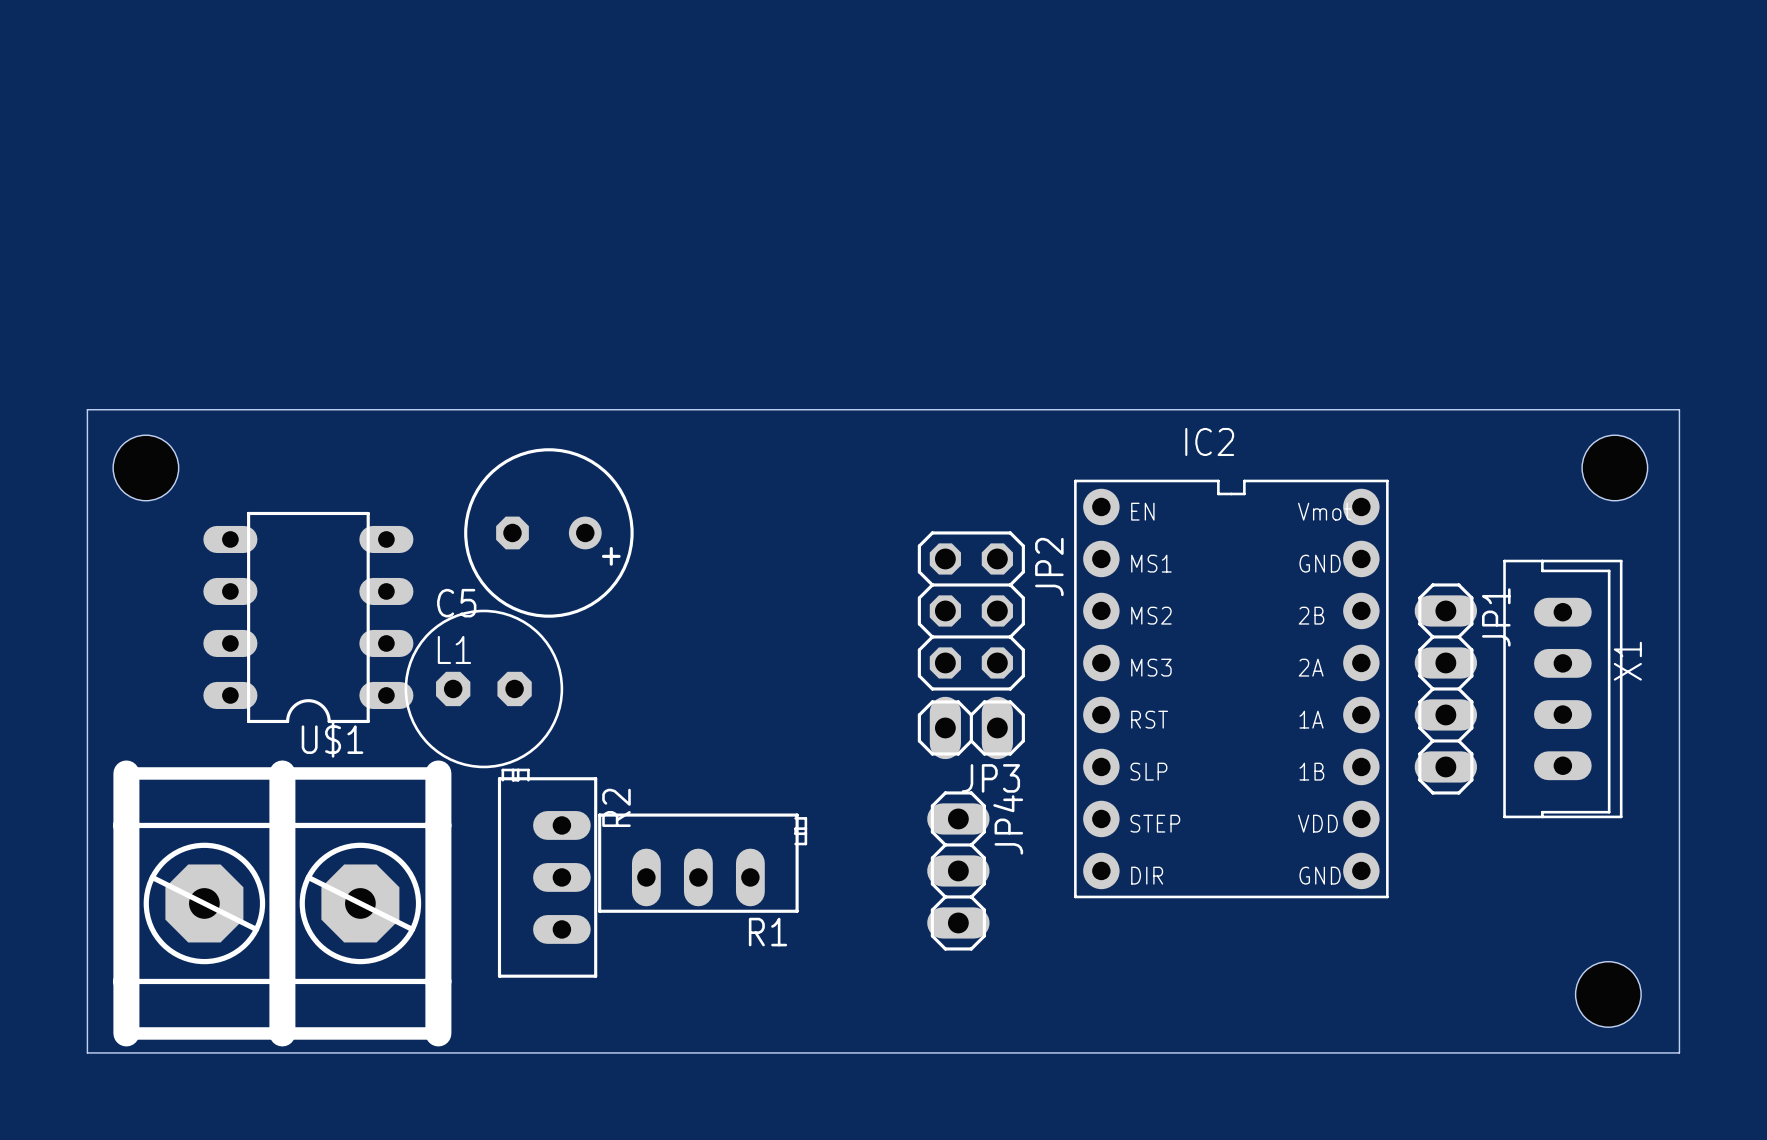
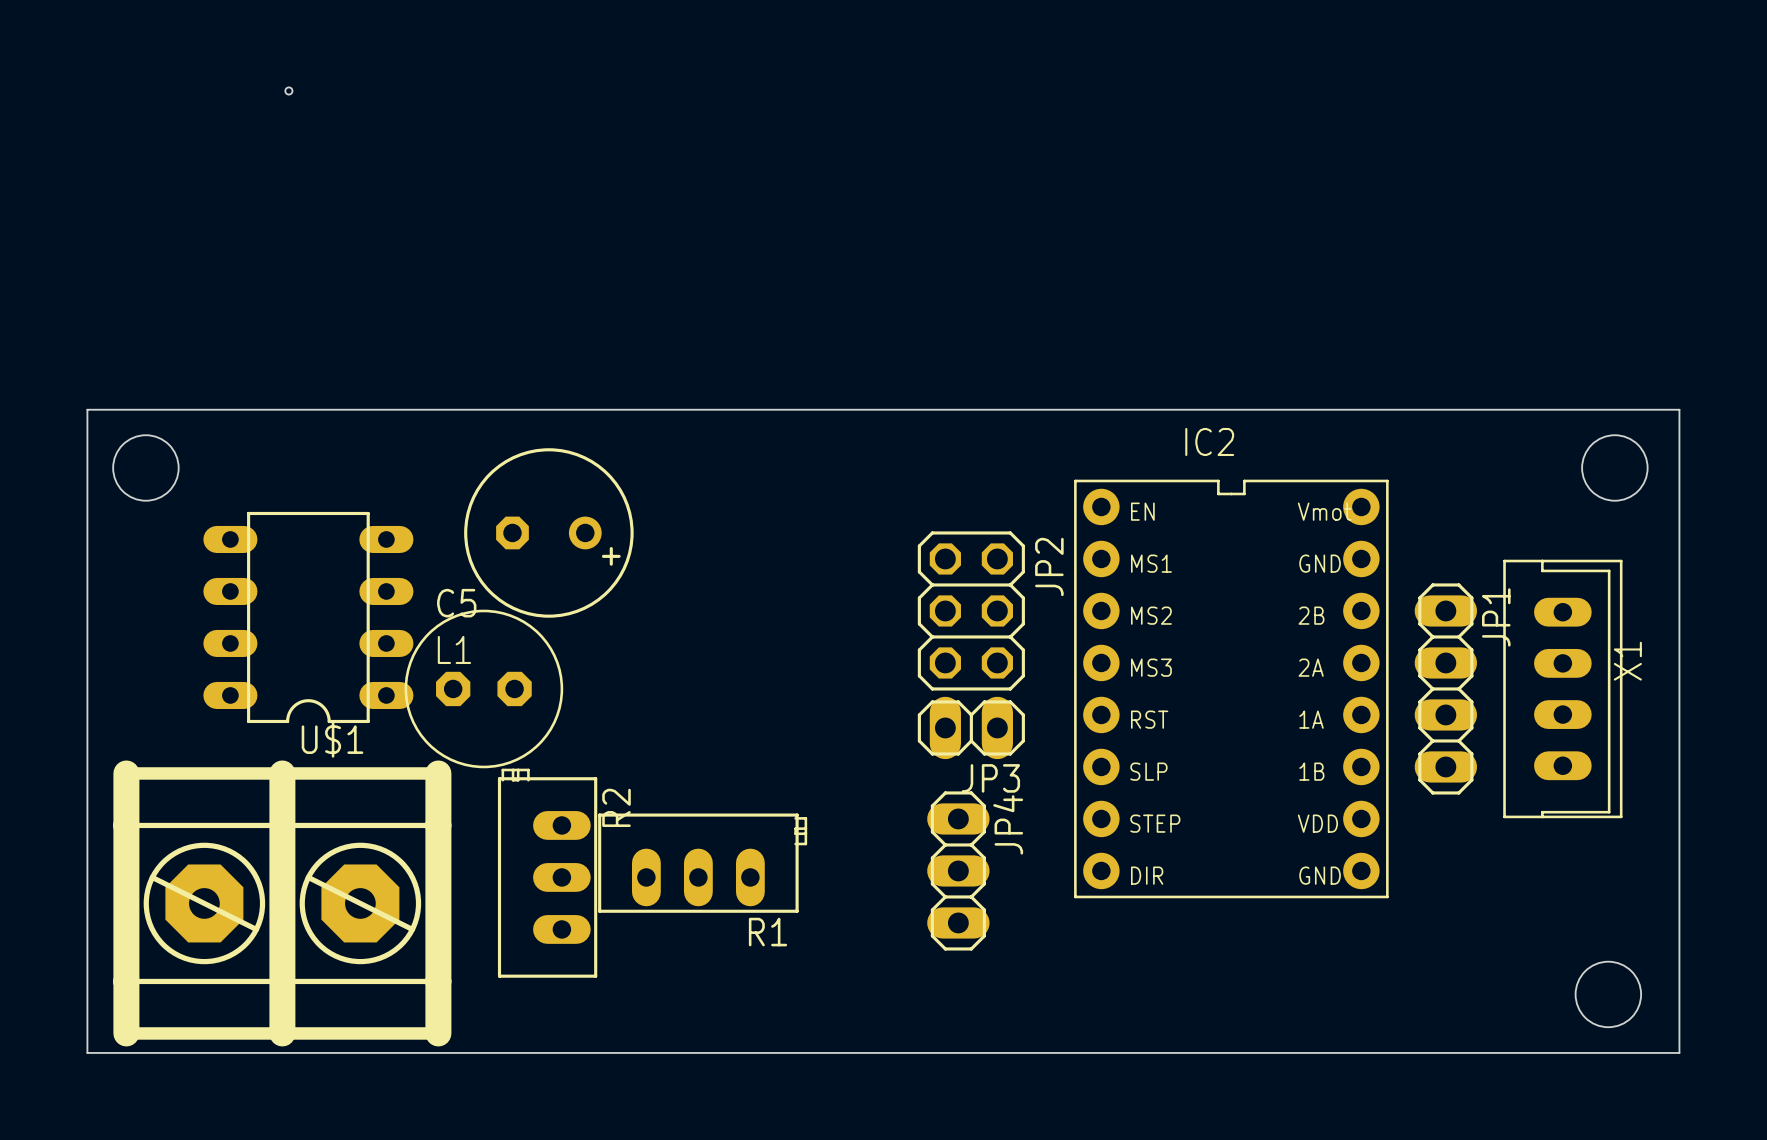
hole: none -> (288, 90)

